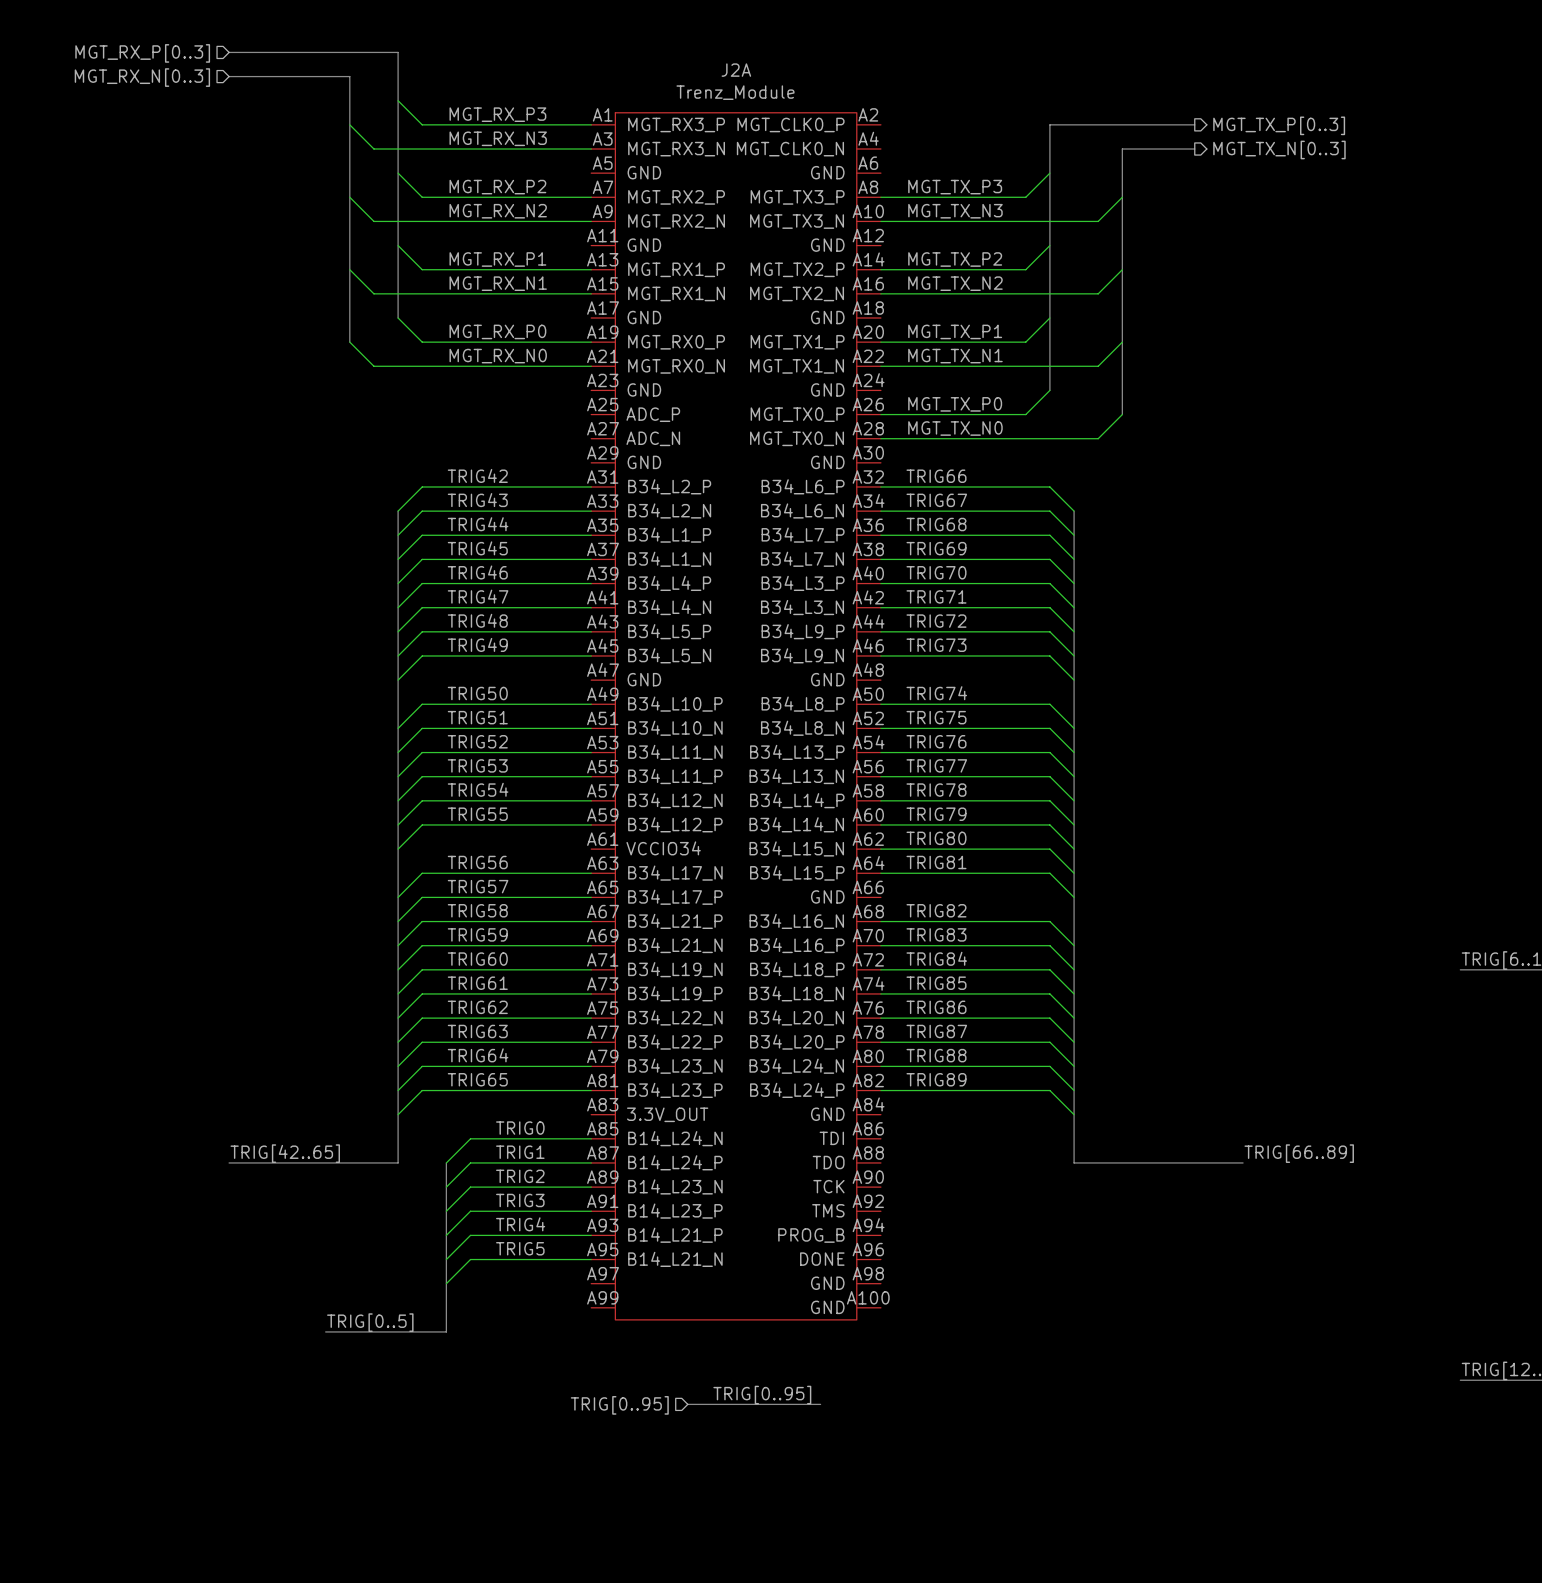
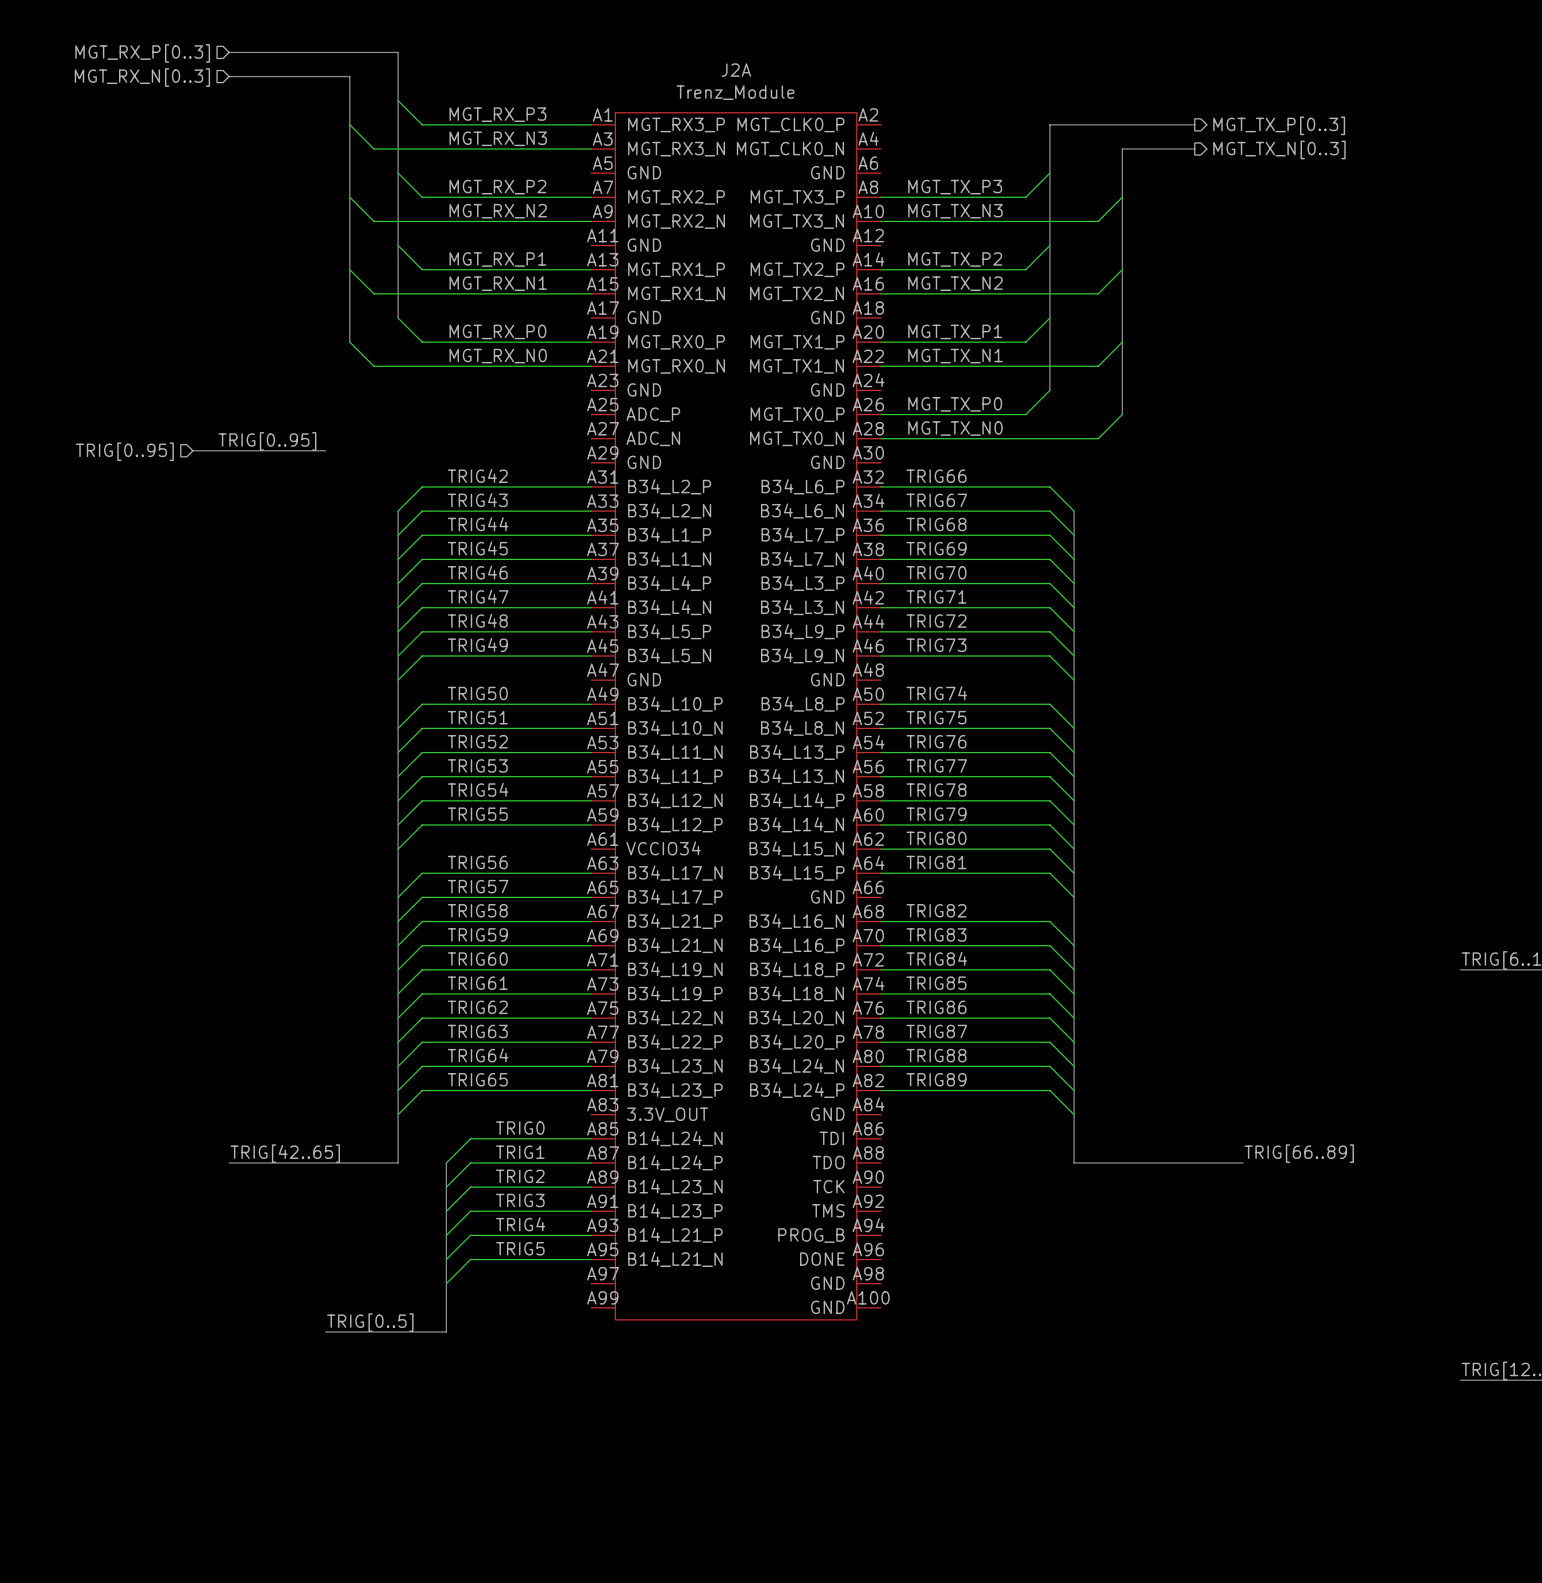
label: none -> TRIG[0..95] (267, 441)
bus: none -> (192, 450) (325, 450)
hierarchical label: none -> TRIG[0..95] (124, 451)
label: TRIG[0..95] (762, 1395) -> none
bus: (687, 1404) (820, 1404) -> none
hierarchical label: TRIG[0..95] (619, 1405) -> none

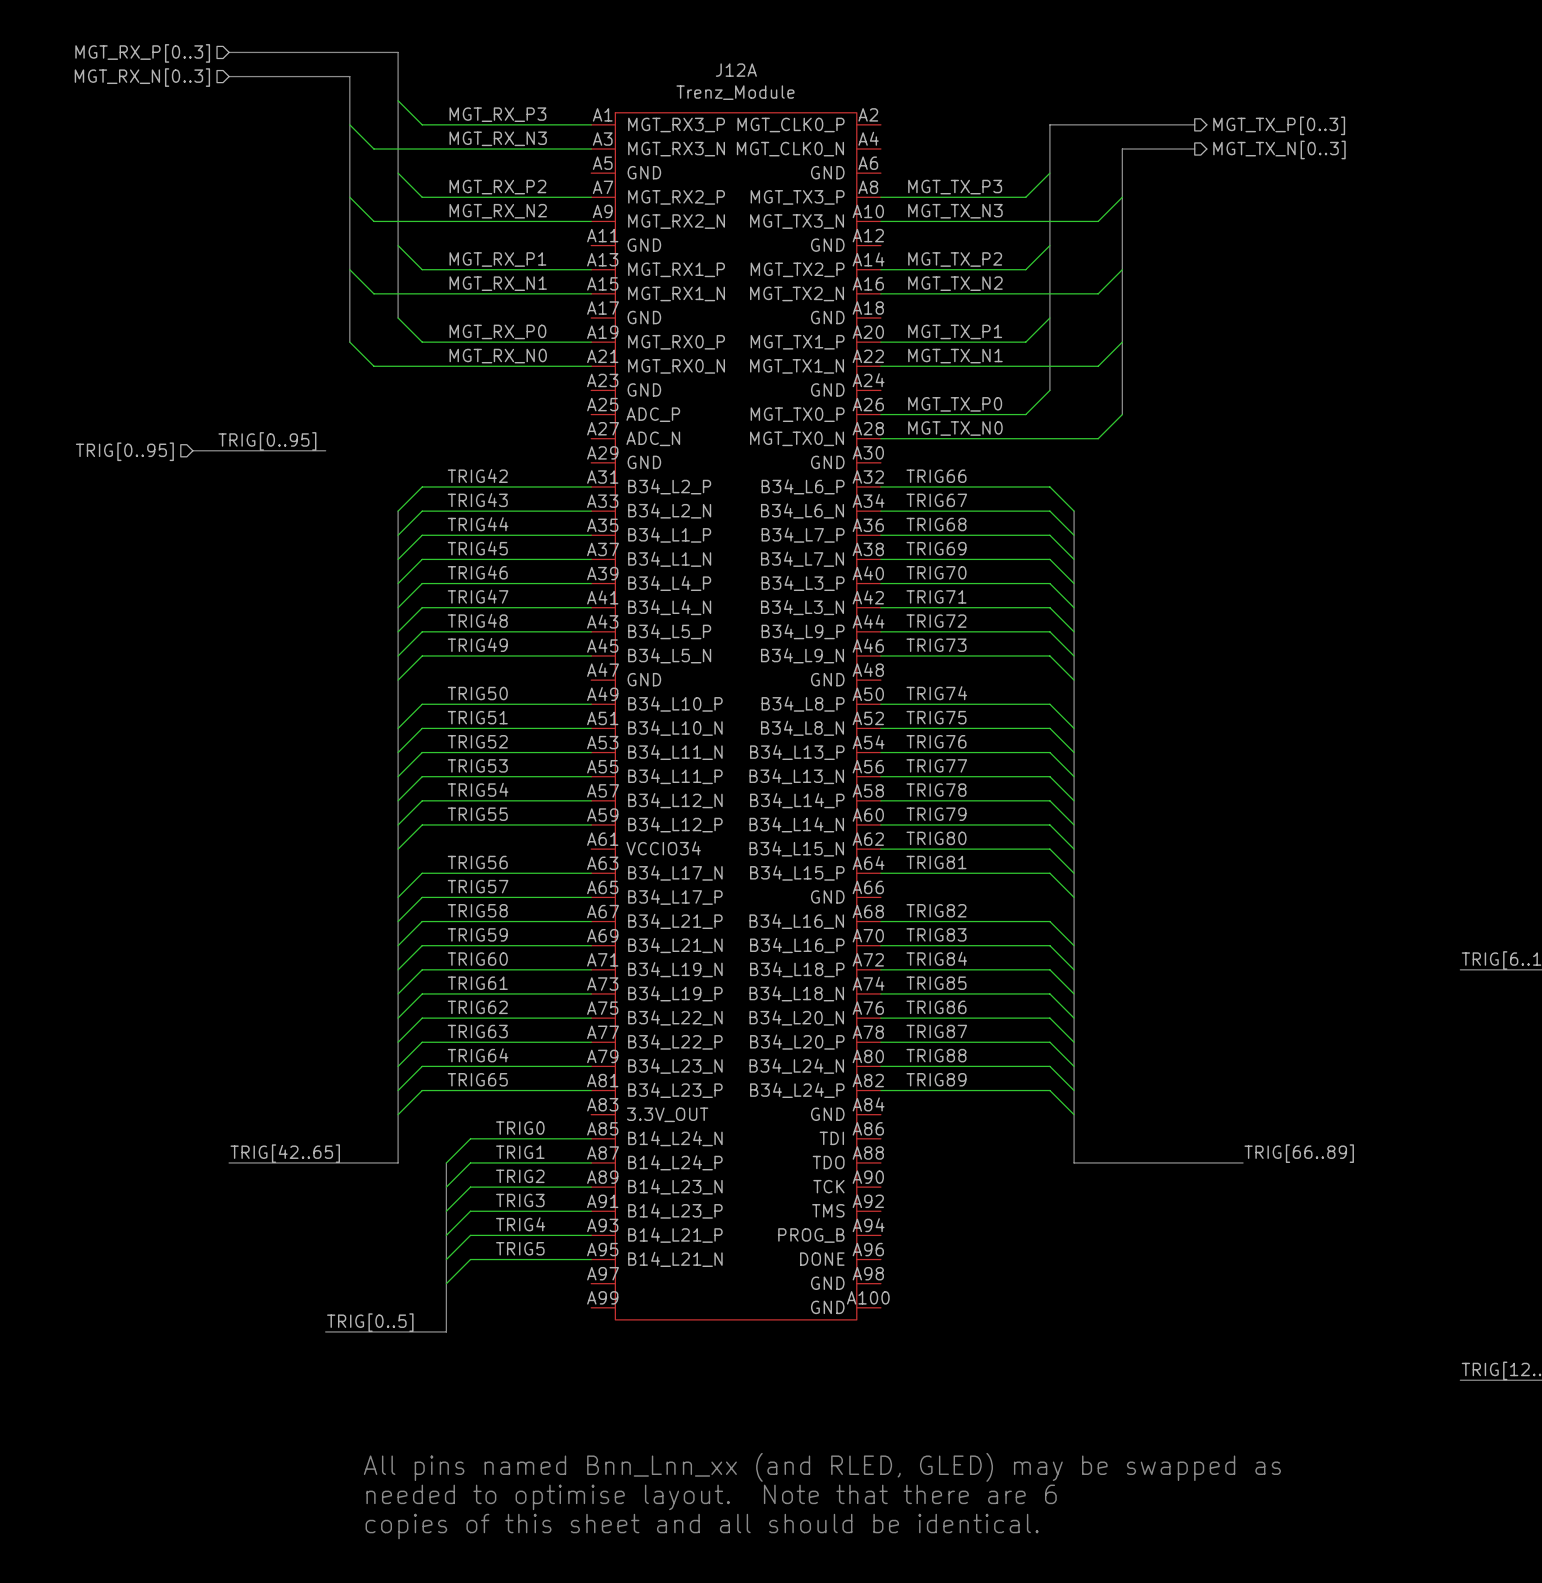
J2A name: J2A (736, 70) -> J12A (736, 70)
text: none -> All pins named Bnn_Lnn_xx (and RLED, GLED) may be swapped as (822, 1467)
text: none -> needed to optimise layout. Note that there are 6 (711, 1497)
text: none -> copies of this sheet and all should be identical. (702, 1526)

